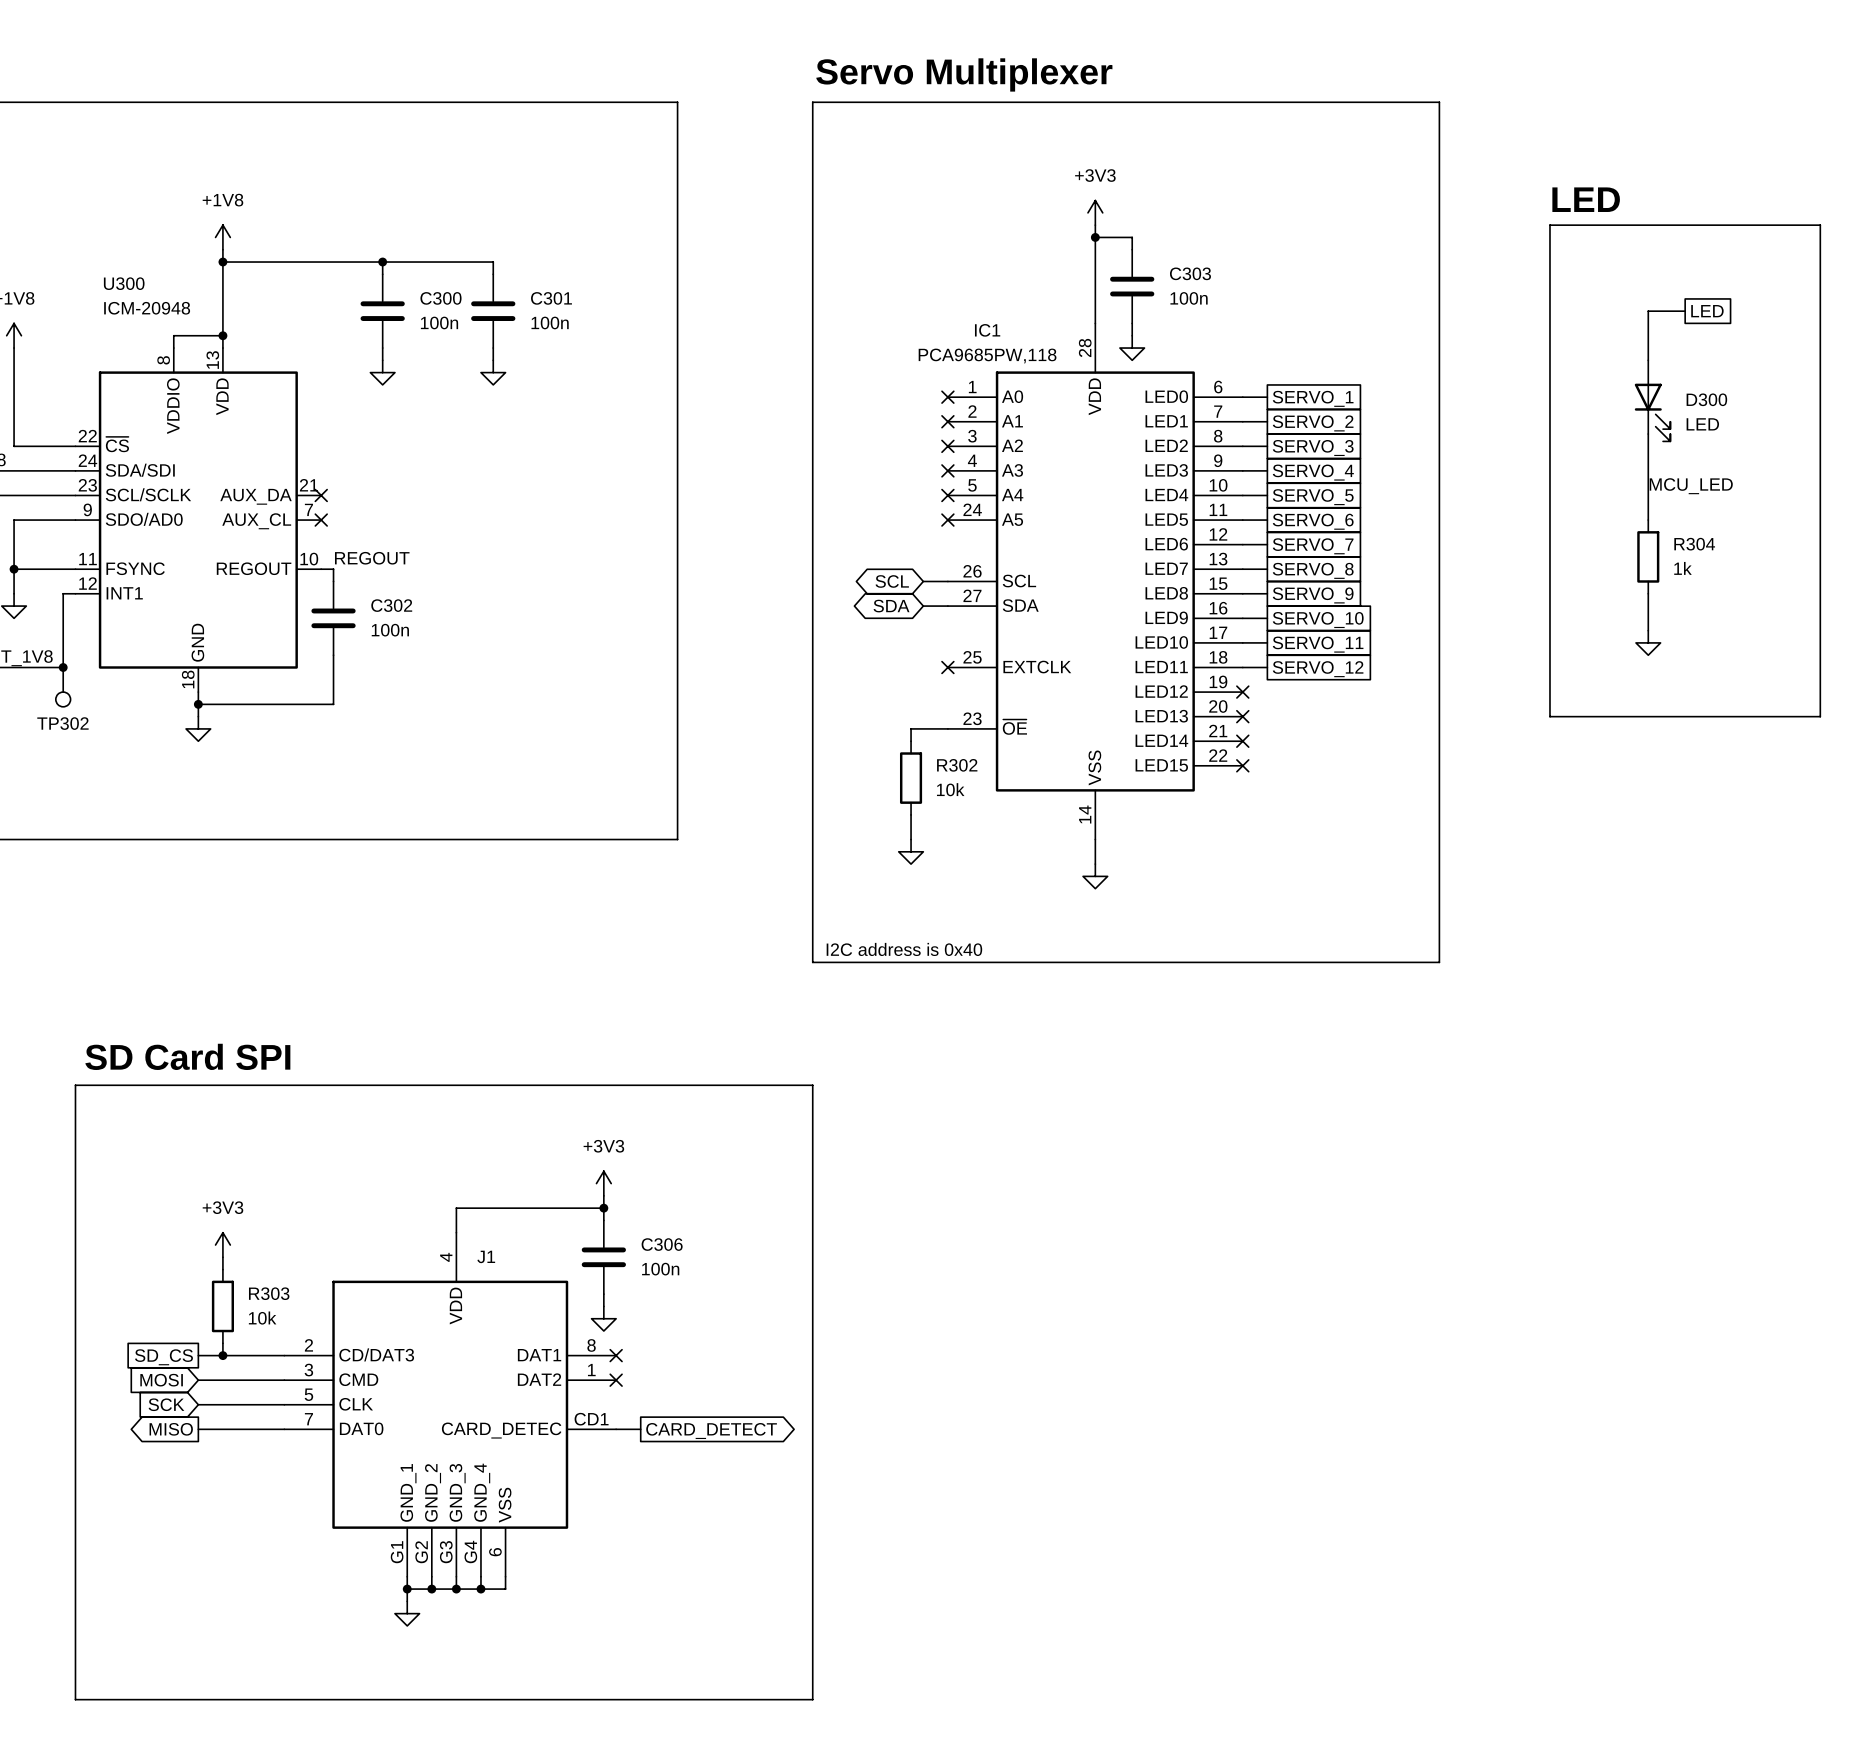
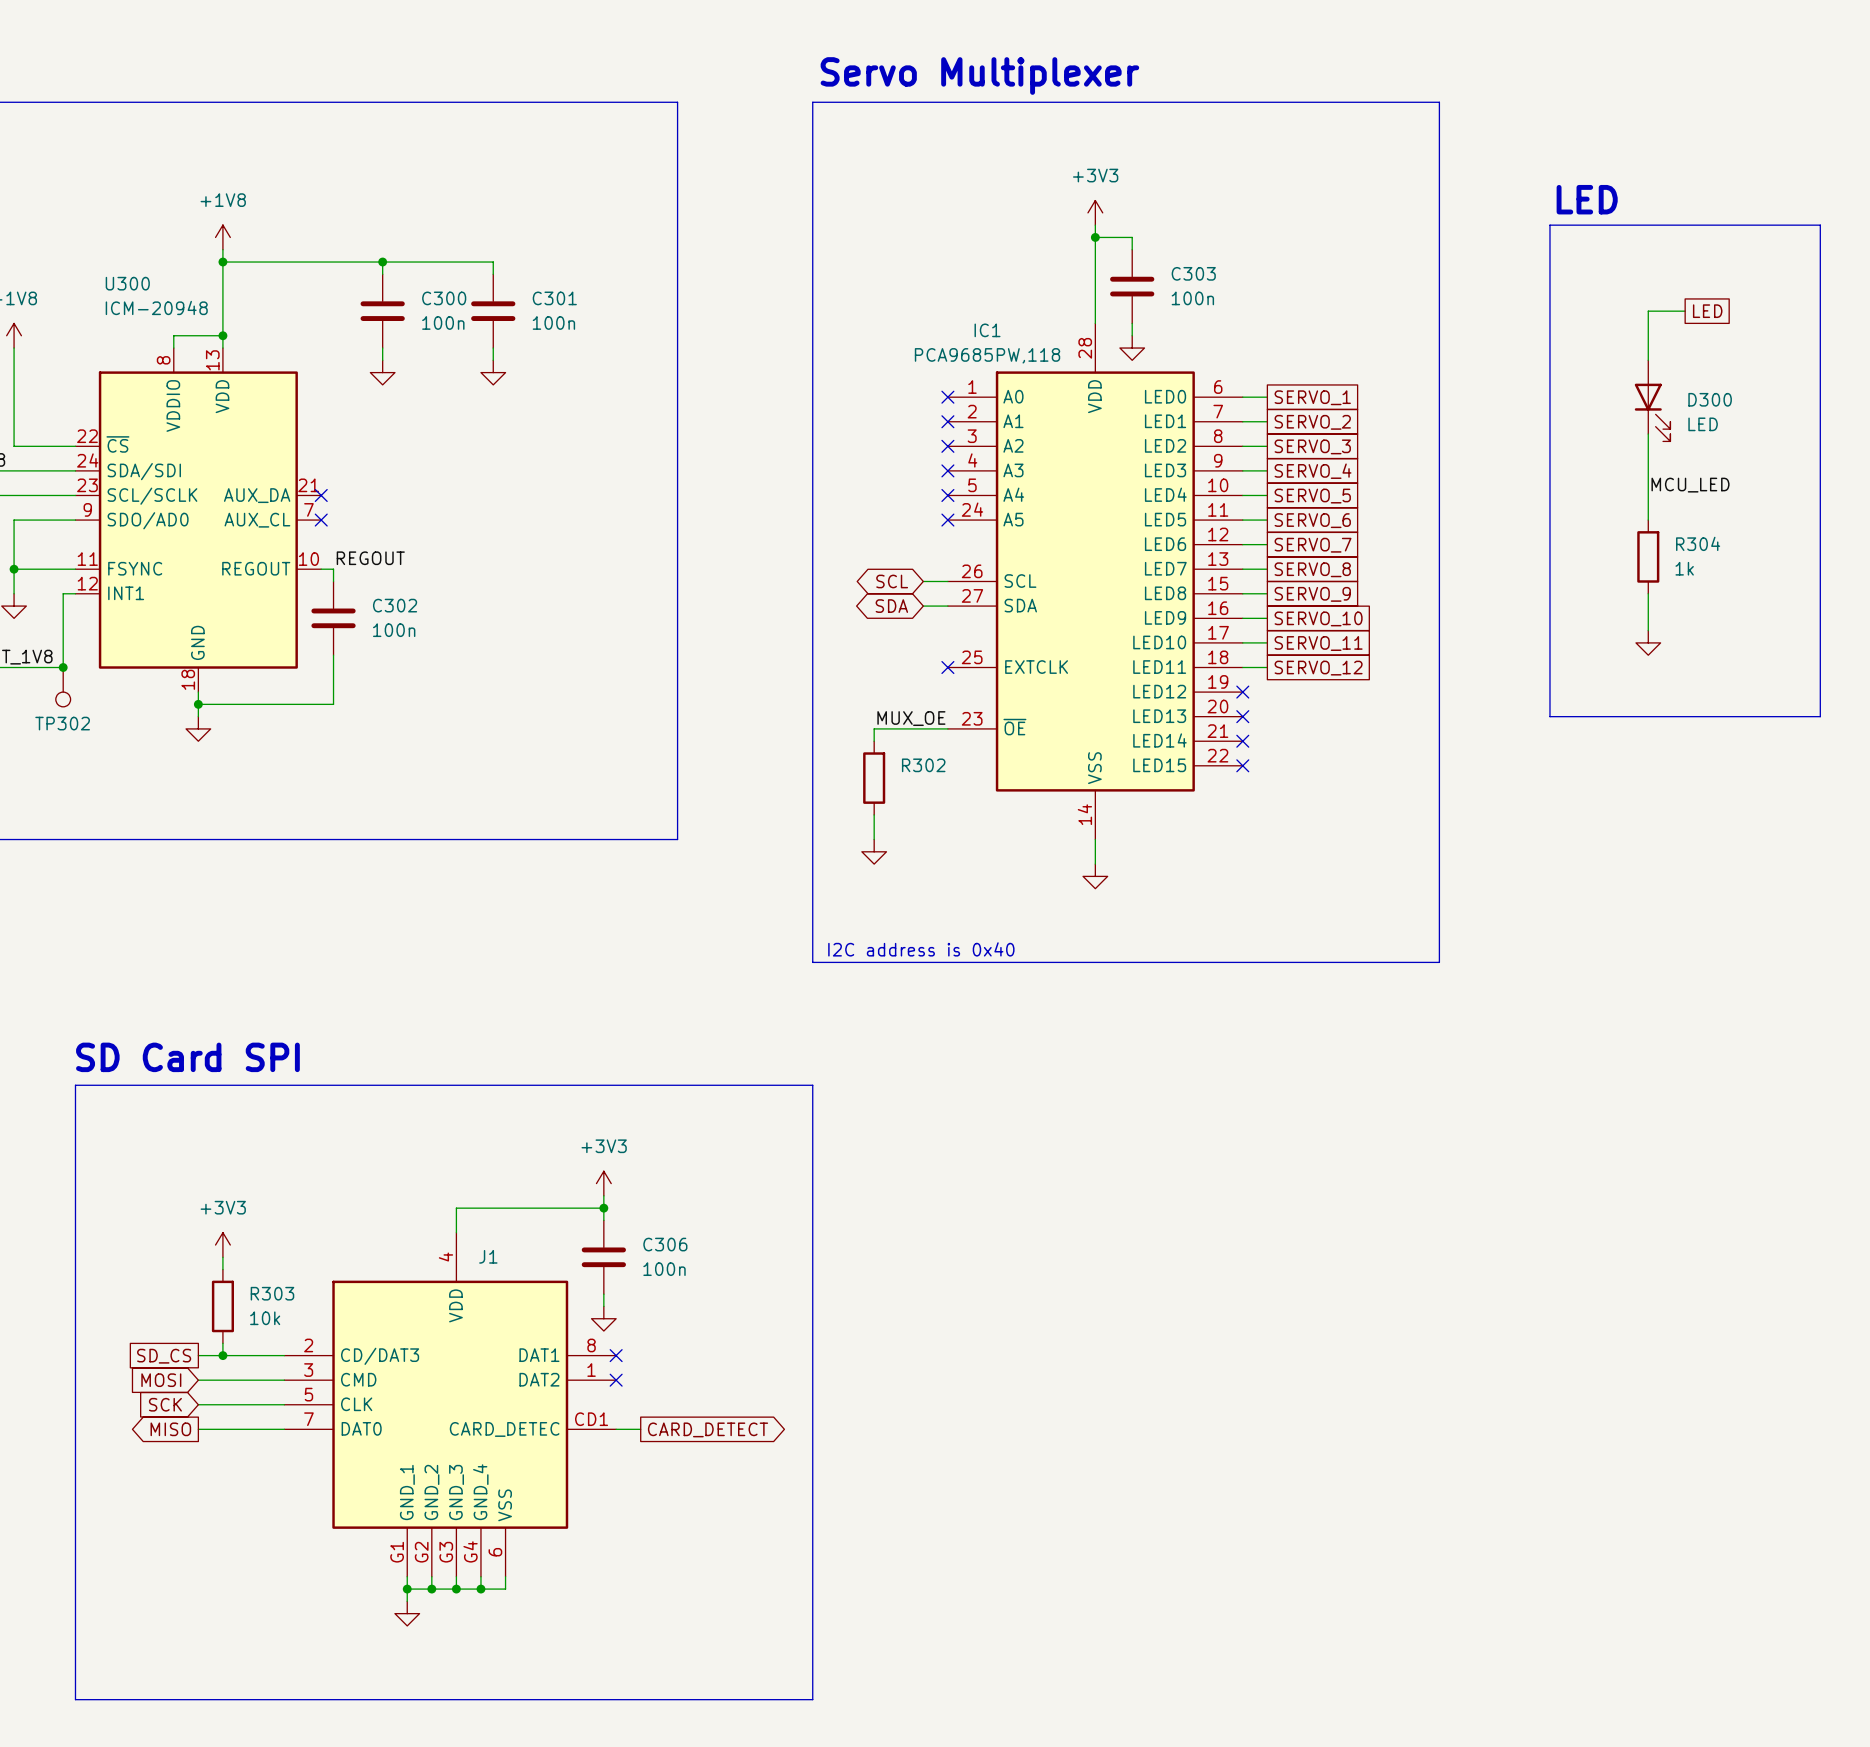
label: none -> MUX_OE (911, 718)
wire: (911, 728) (911, 741) -> (911, 728) (874, 728) (874, 741)
R302 position: (911, 778) -> (874, 778)
R302 value: 10k (950, 789) -> none
wire: (911, 814) (911, 839) -> (874, 814) (874, 839)
power symbol position: (911, 851) -> (874, 851)

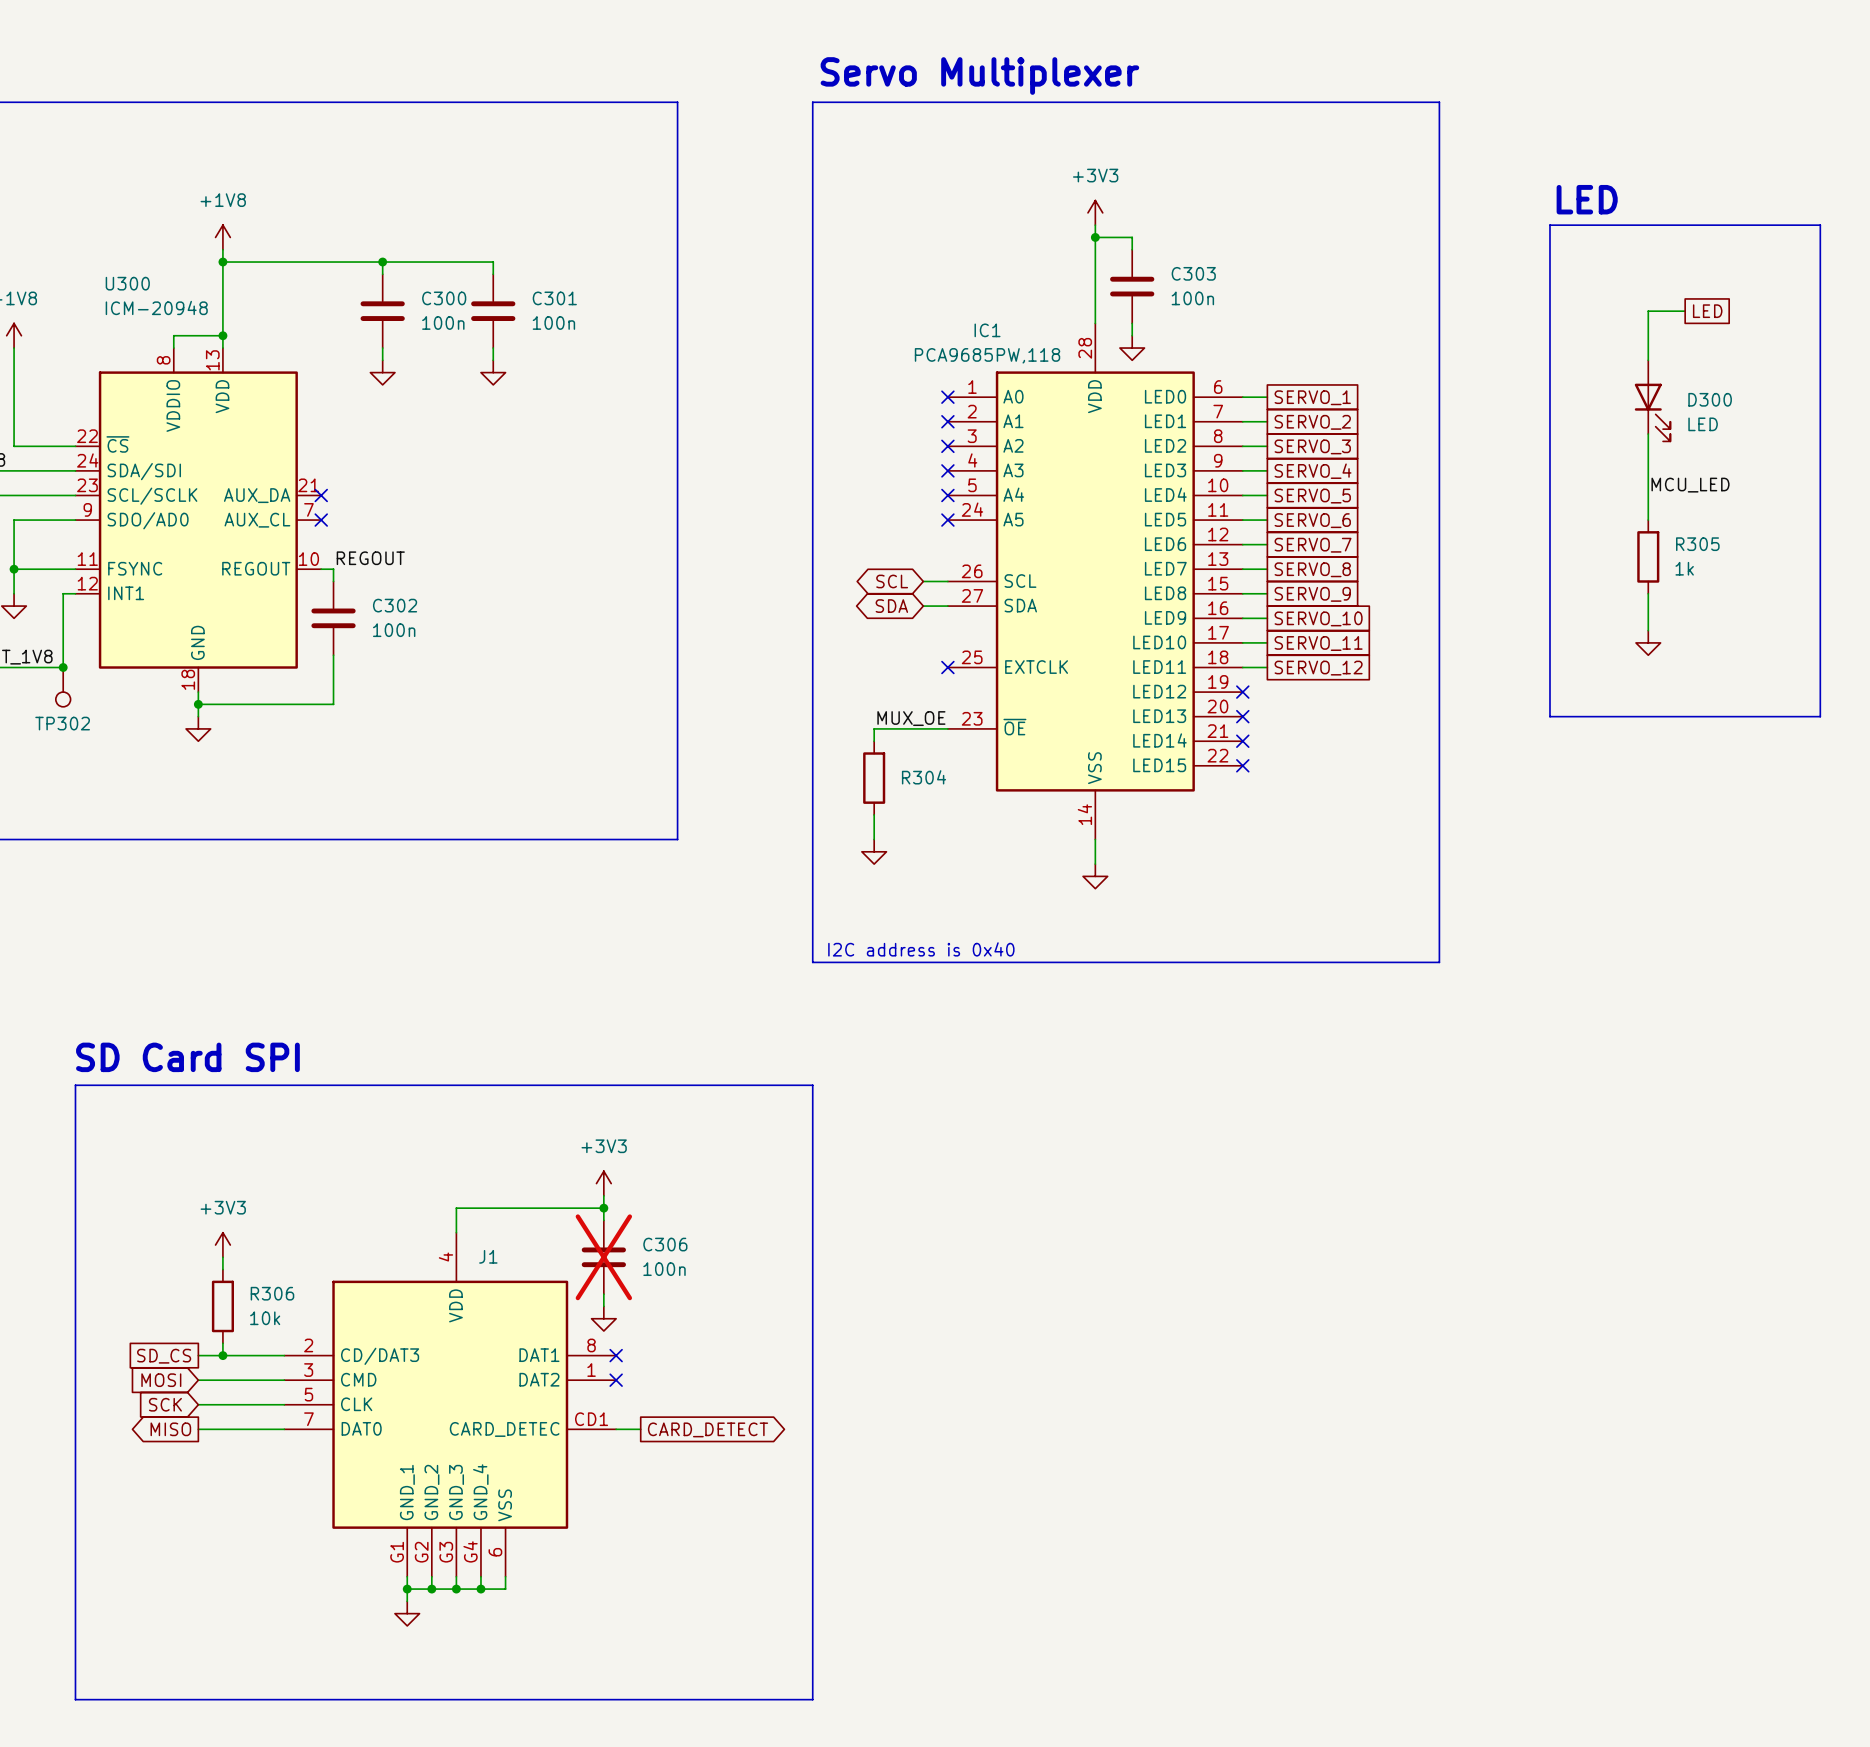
R304 name: R304 (1698, 543) -> R305 (1697, 544)
R302 name: R302 (923, 765) -> R304 (924, 777)
C306 do-not-place cross: none -> (603, 1257)
R303 name: R303 (272, 1293) -> R306 (272, 1293)

